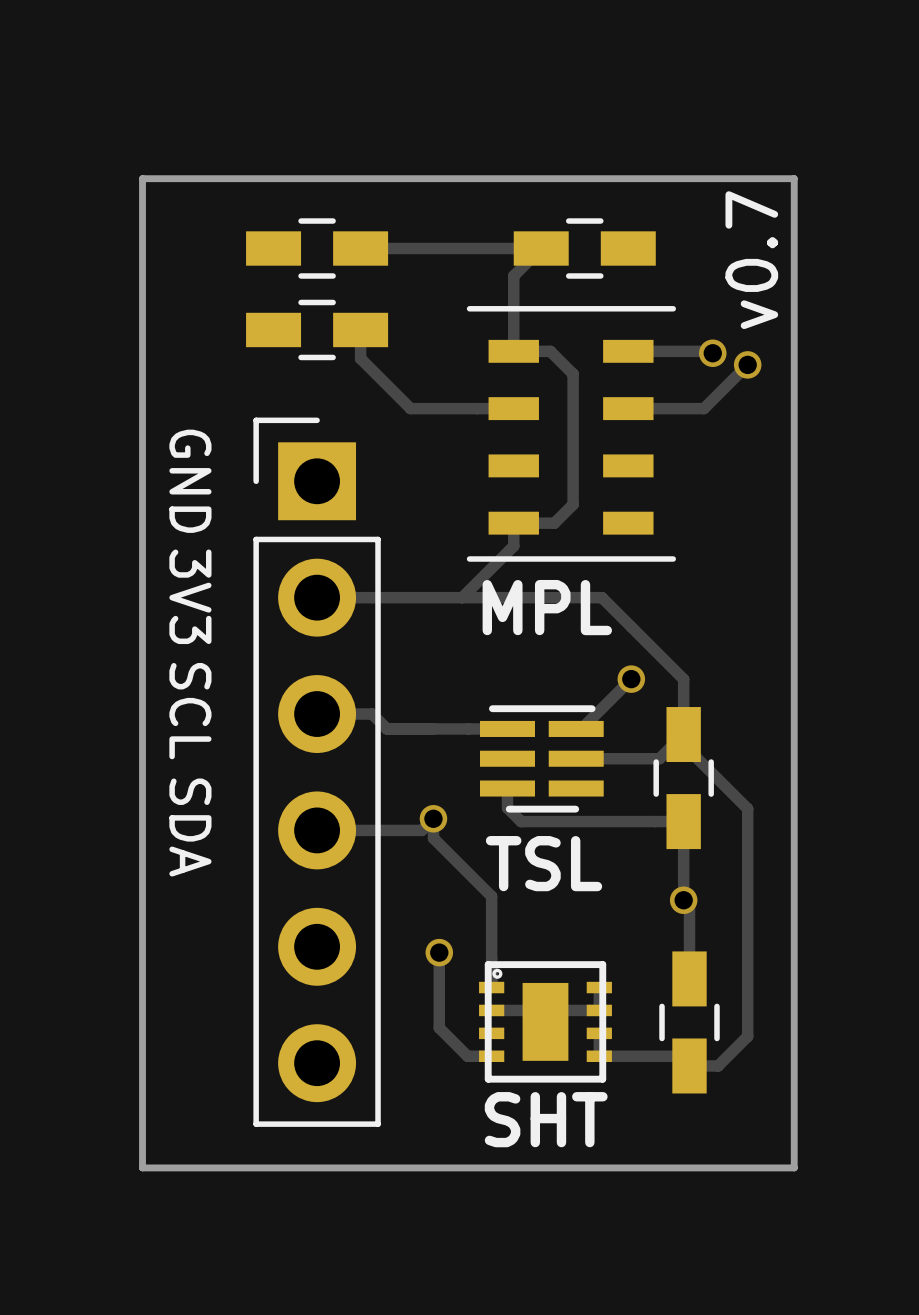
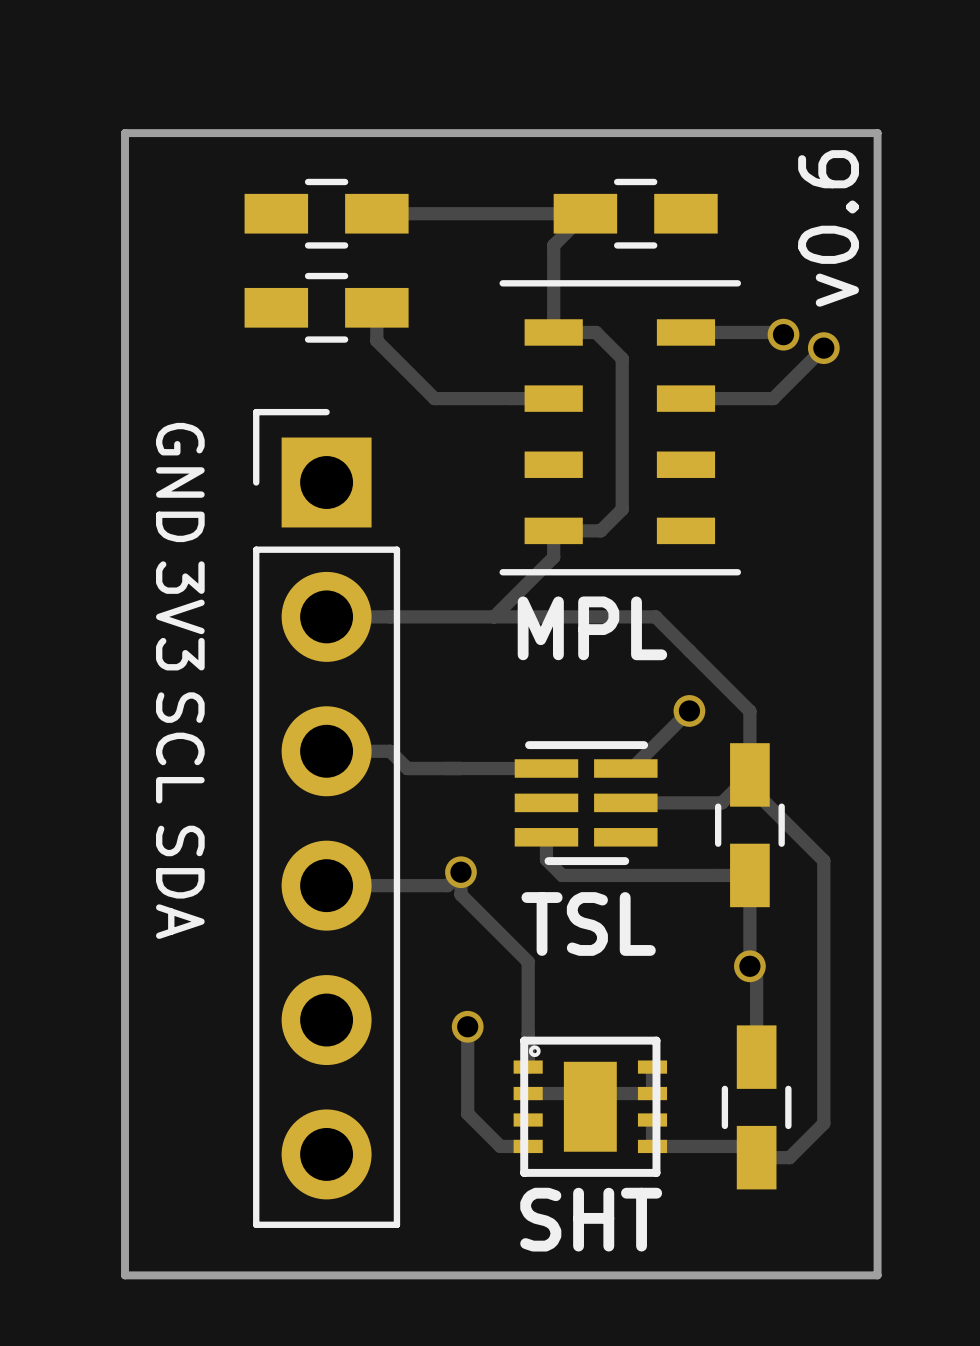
text: v0.7 (751, 260) -> v0.6 (828, 228)

